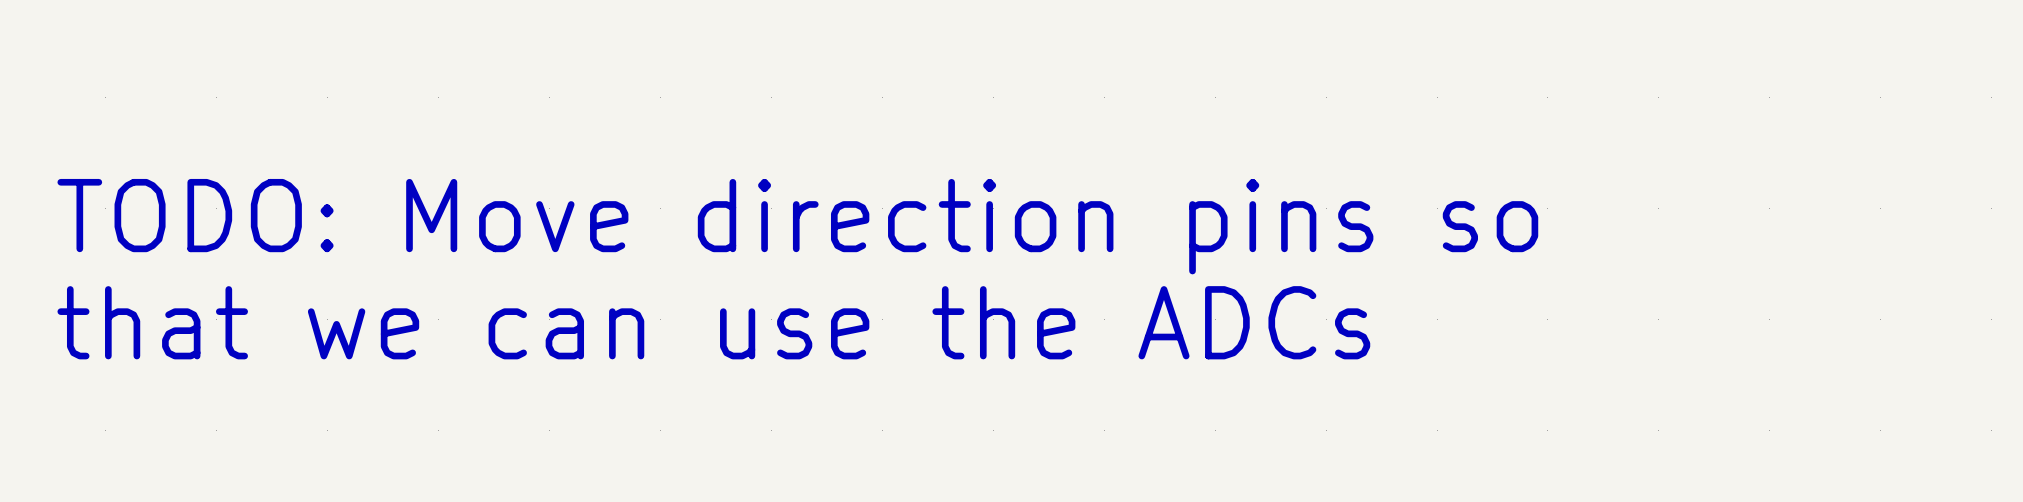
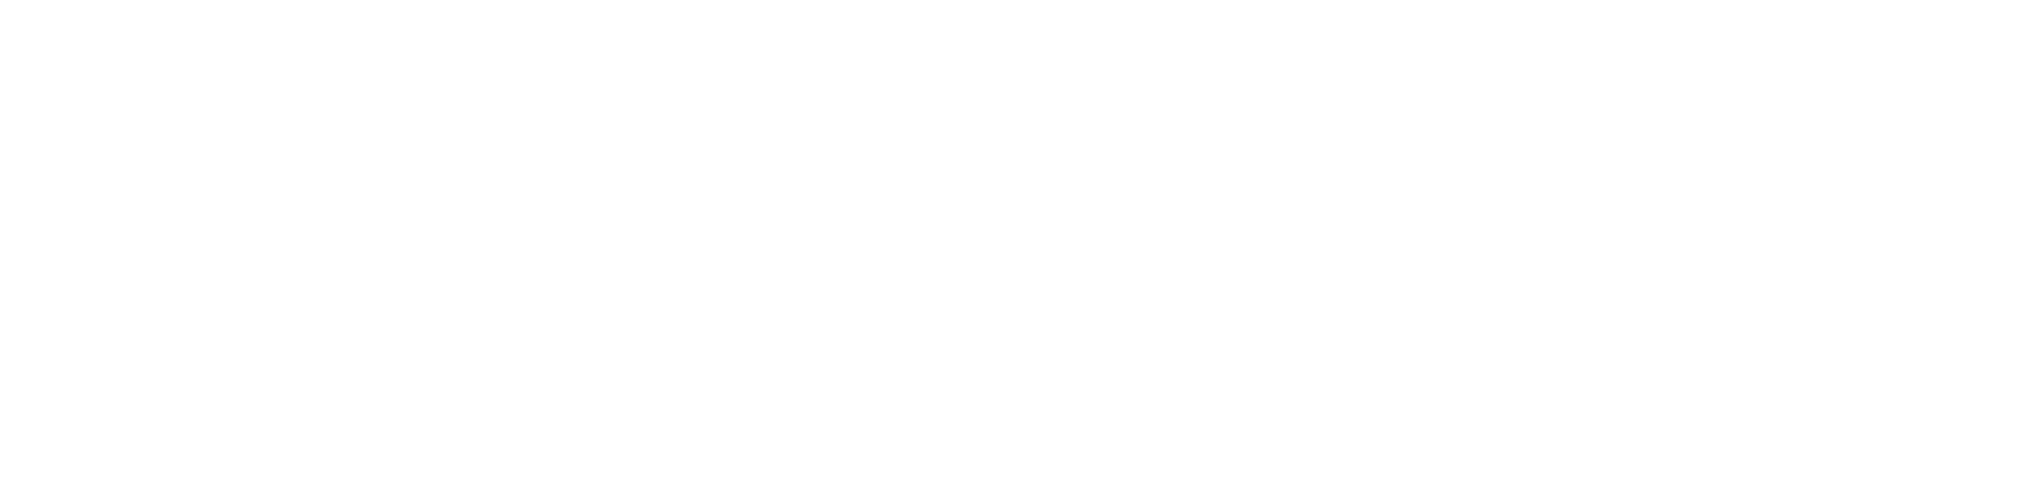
text: TODO: Move direction pins so (797, 226) -> none
text: that we can use the ADCs (713, 322) -> none

